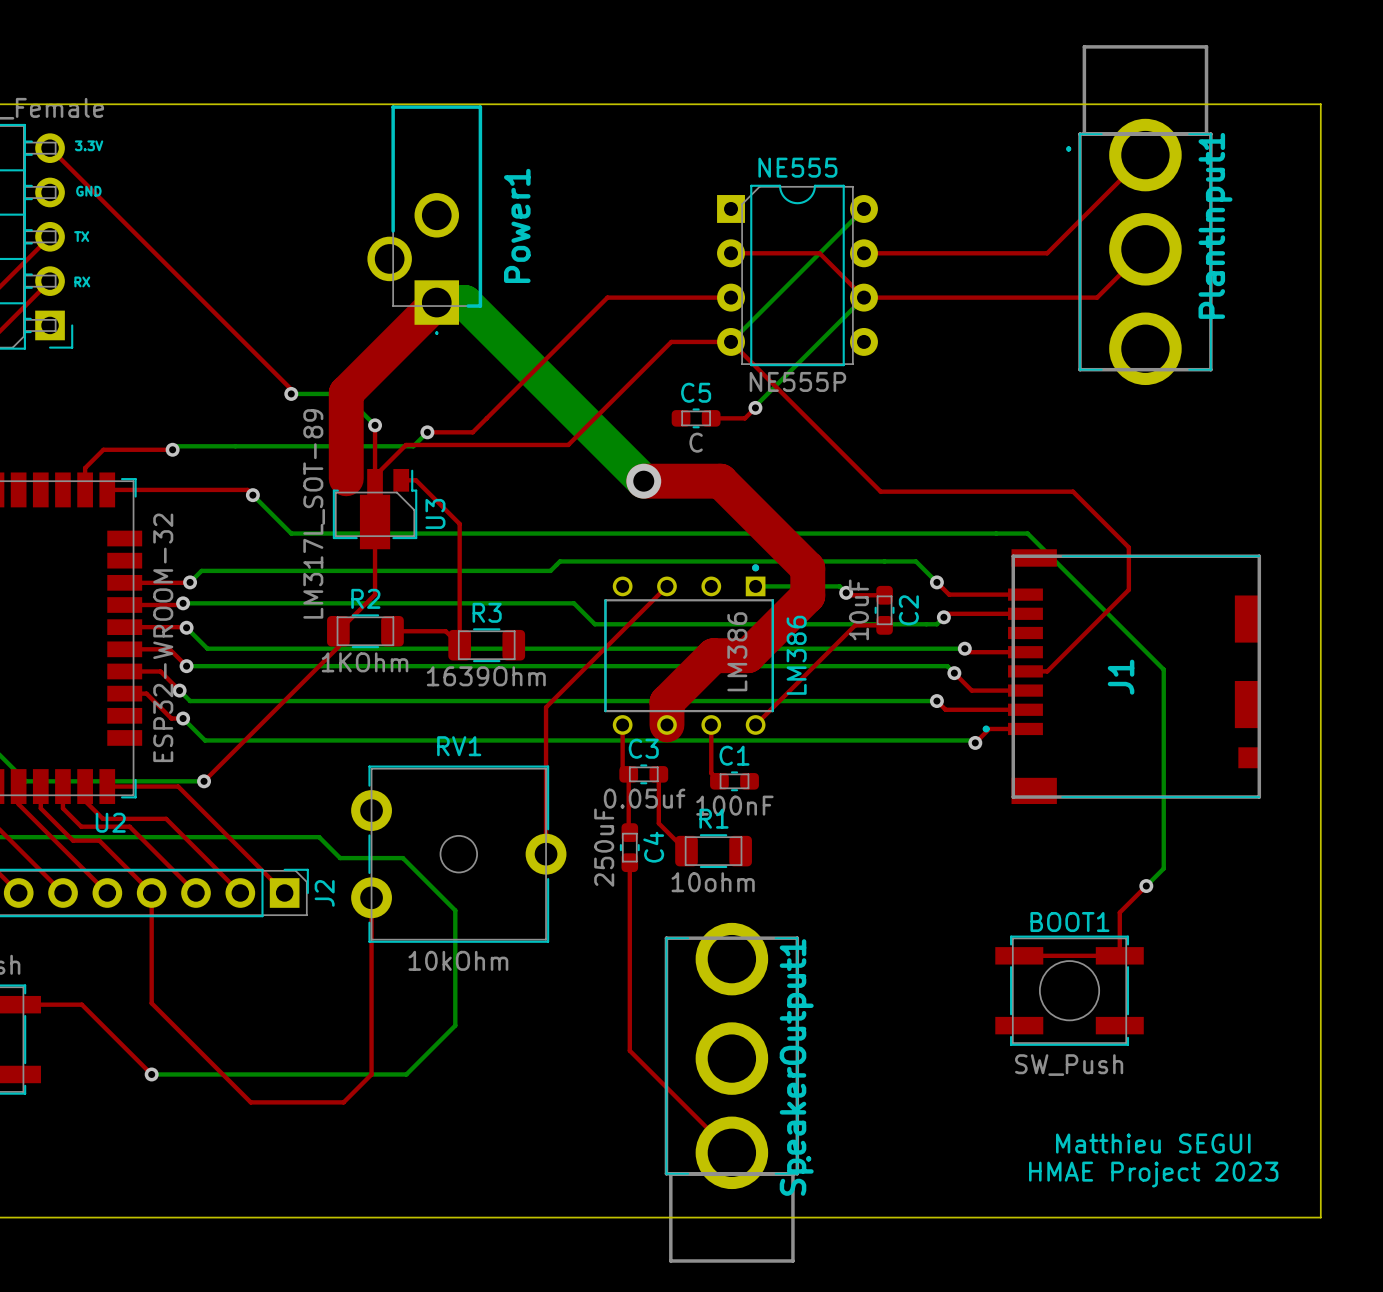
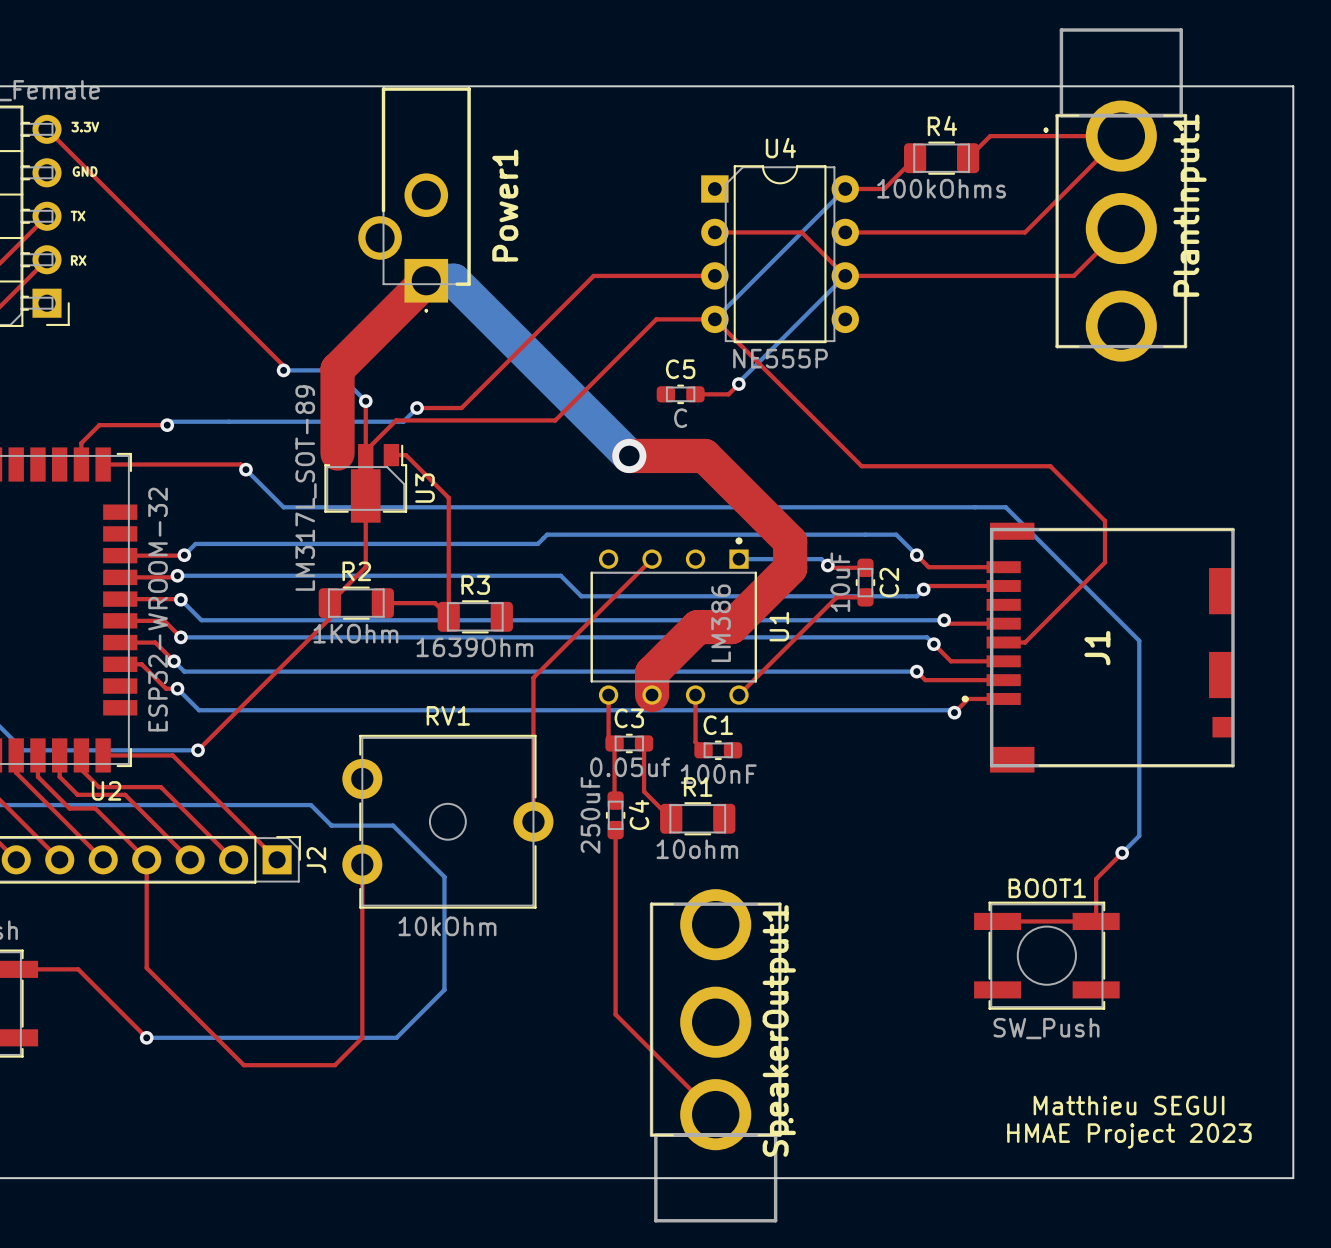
top track: none -> (1121, 136) (990, 136) (968, 158)
NE555 name: NE555 (797, 167) -> U4 (780, 148)
top track: none -> (915, 158) (884, 188) (845, 188)
R4: none -> 100kOhms (941, 158)
LM386 name: LM386 (796, 655) -> U1 (779, 626)

